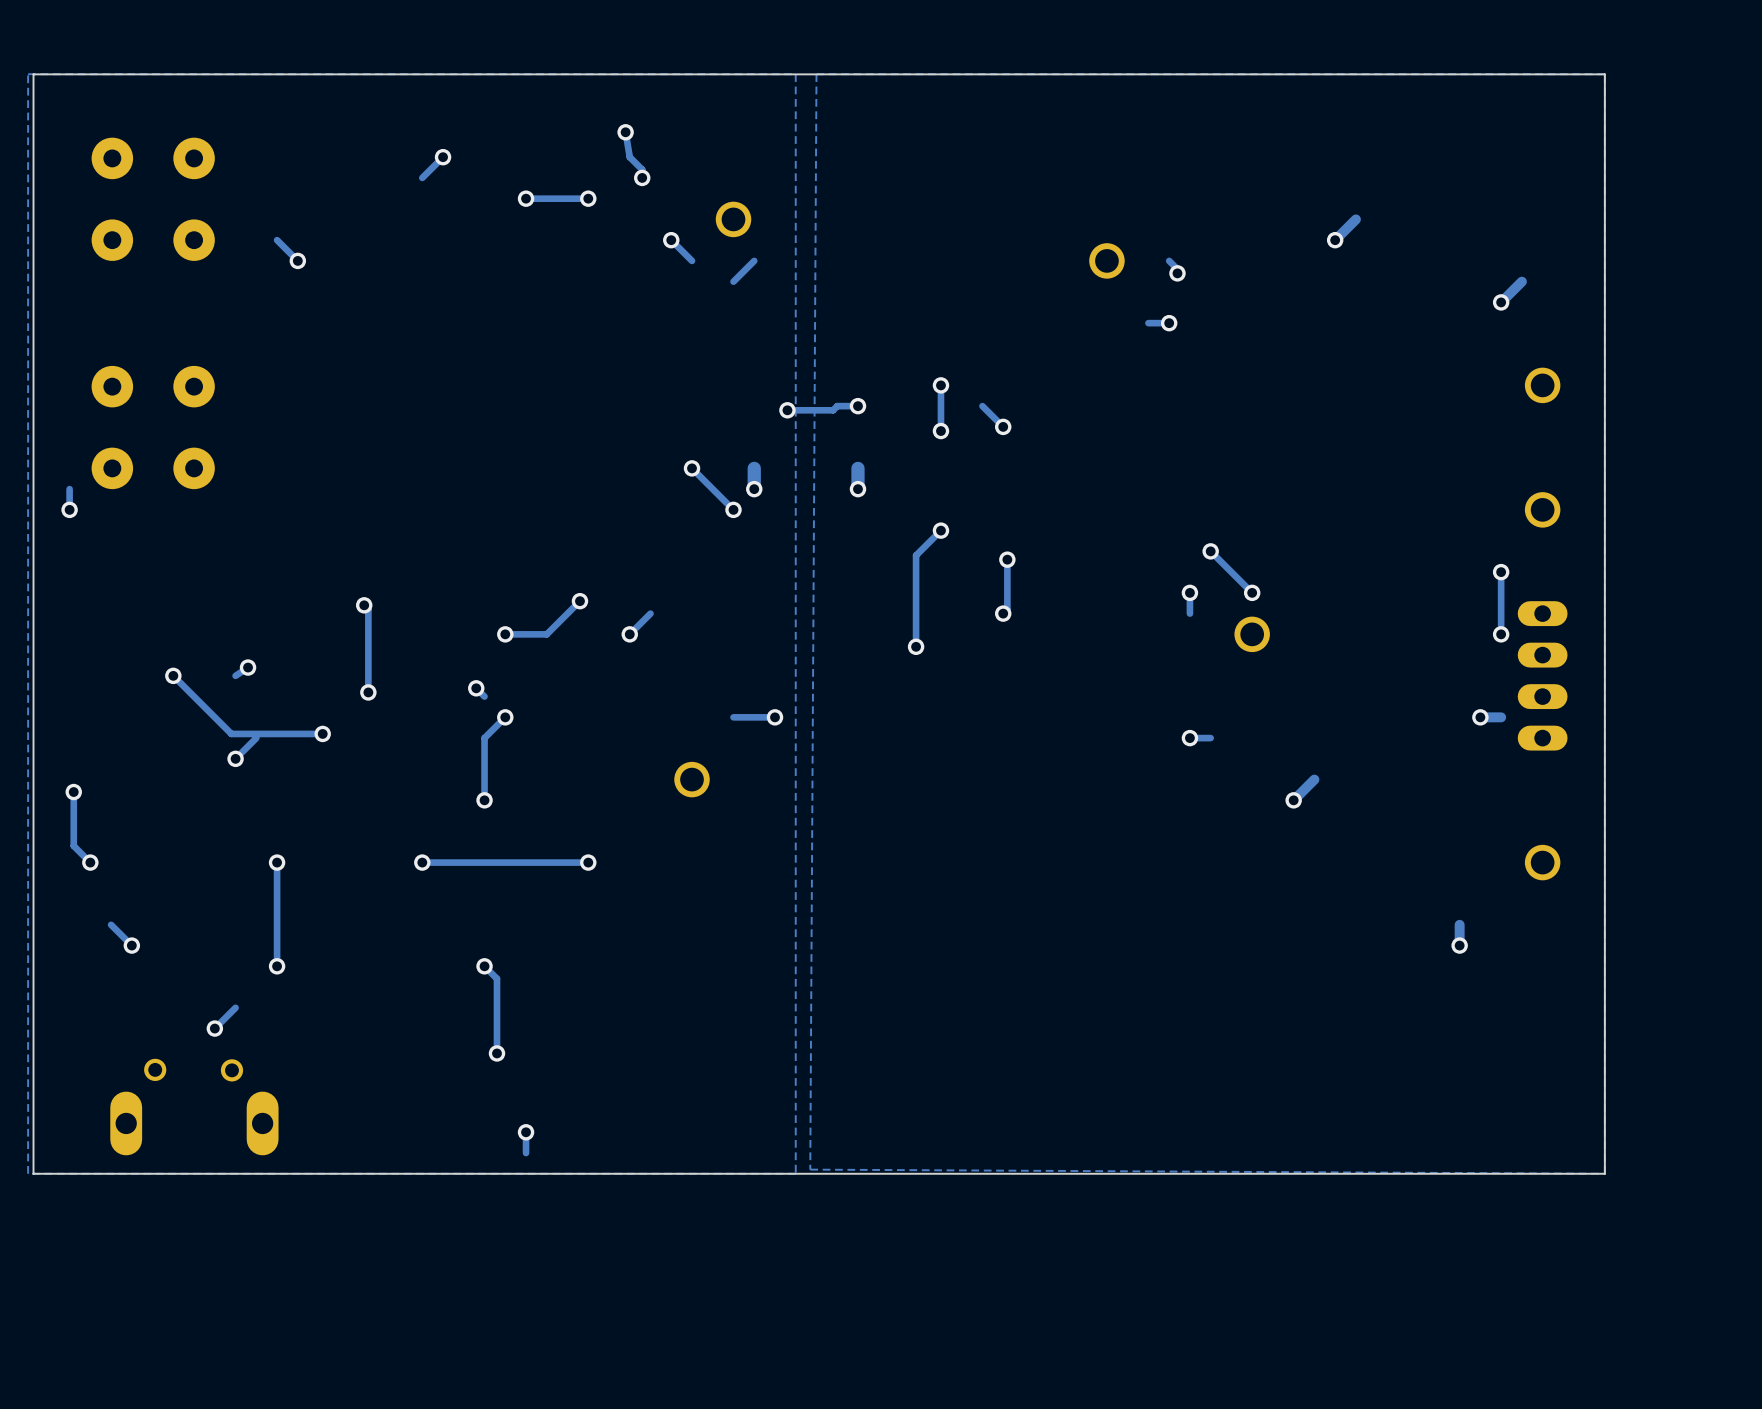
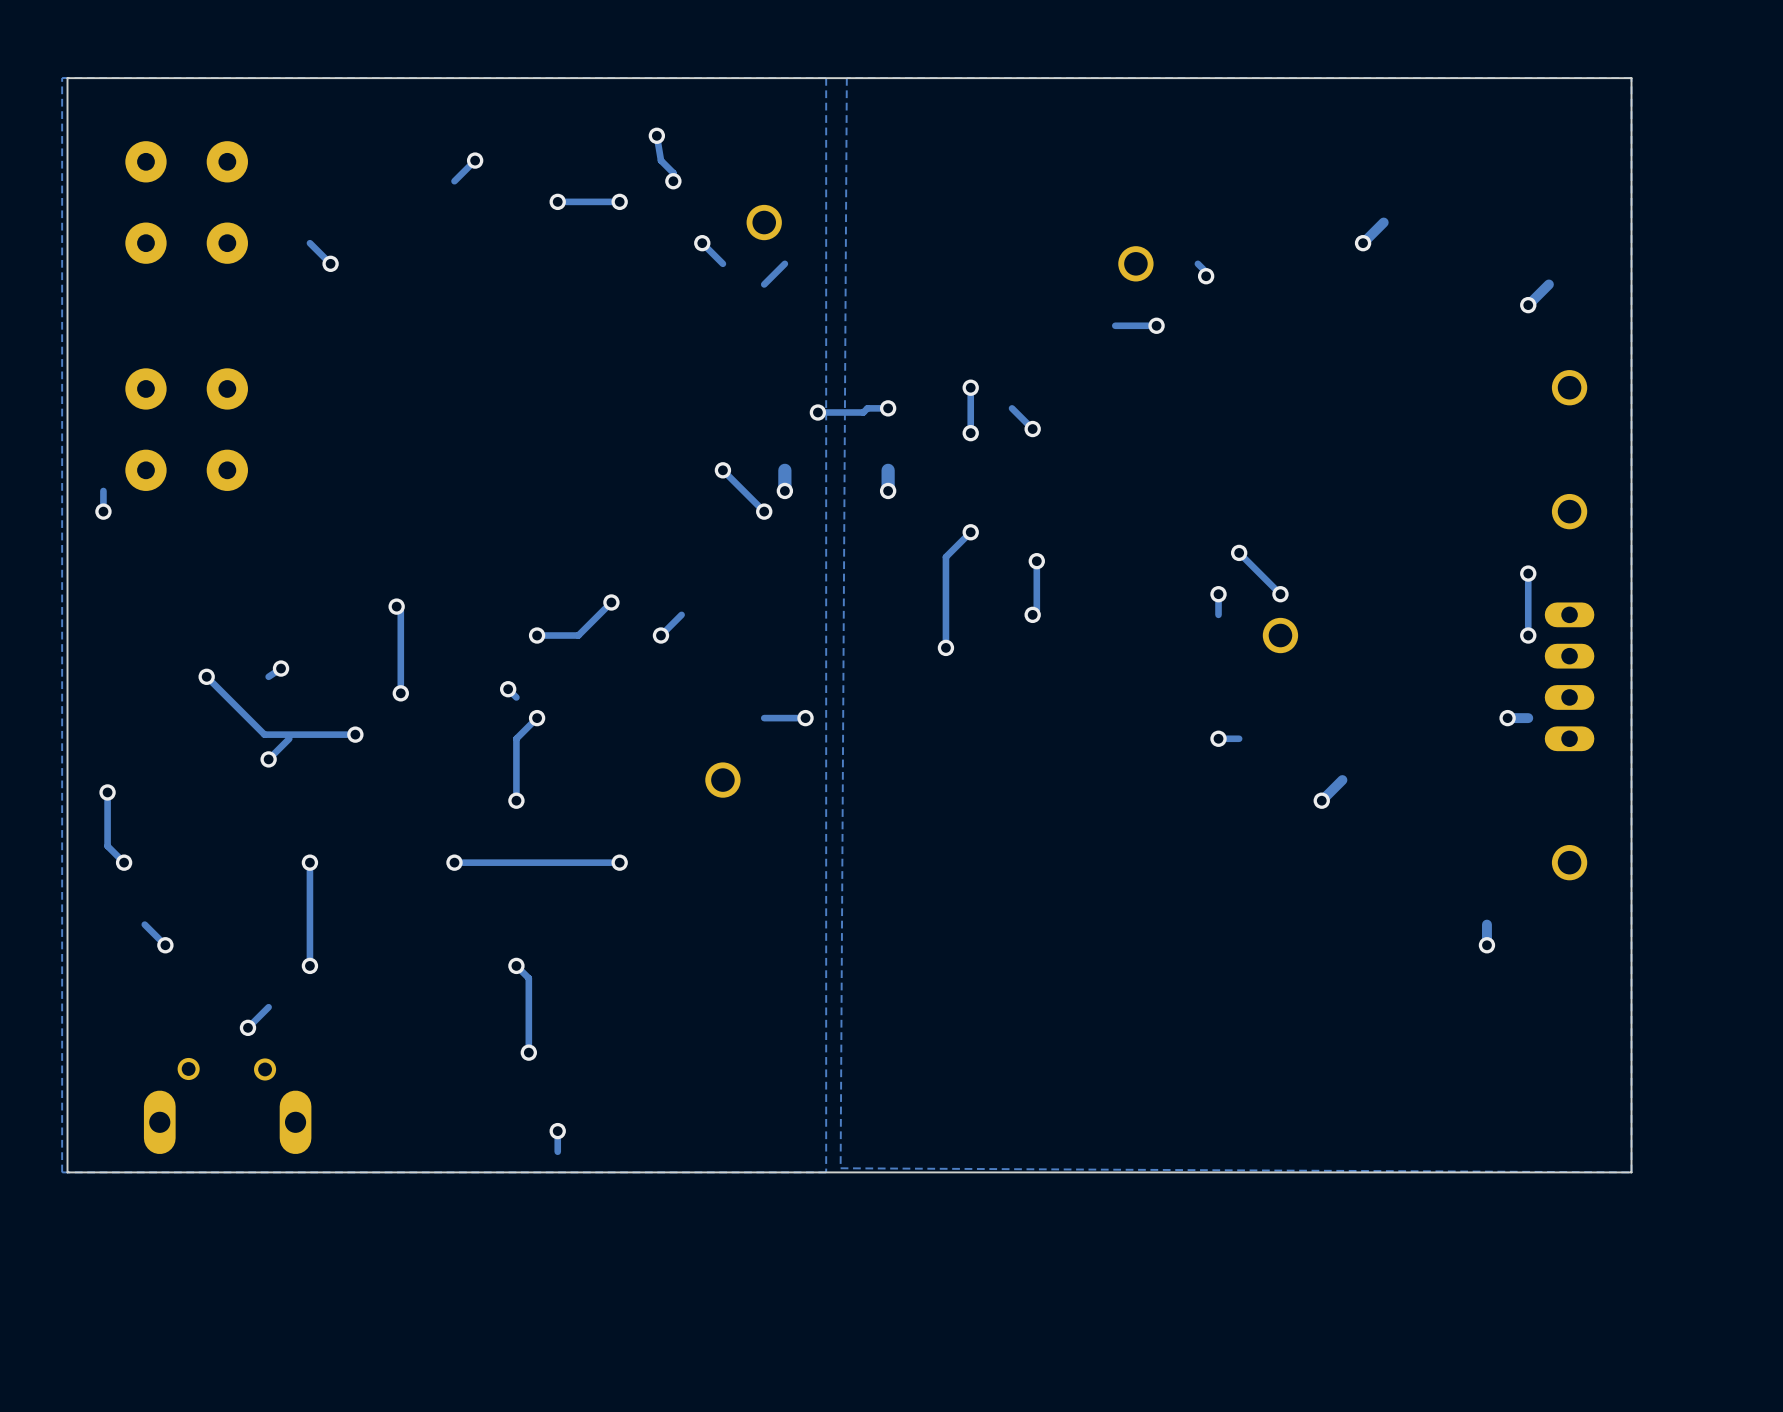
track: none -> (1156, 325) (1115, 325)
track: (1169, 323) (1148, 323) -> none
via position: (1169, 323) -> (1156, 325)

